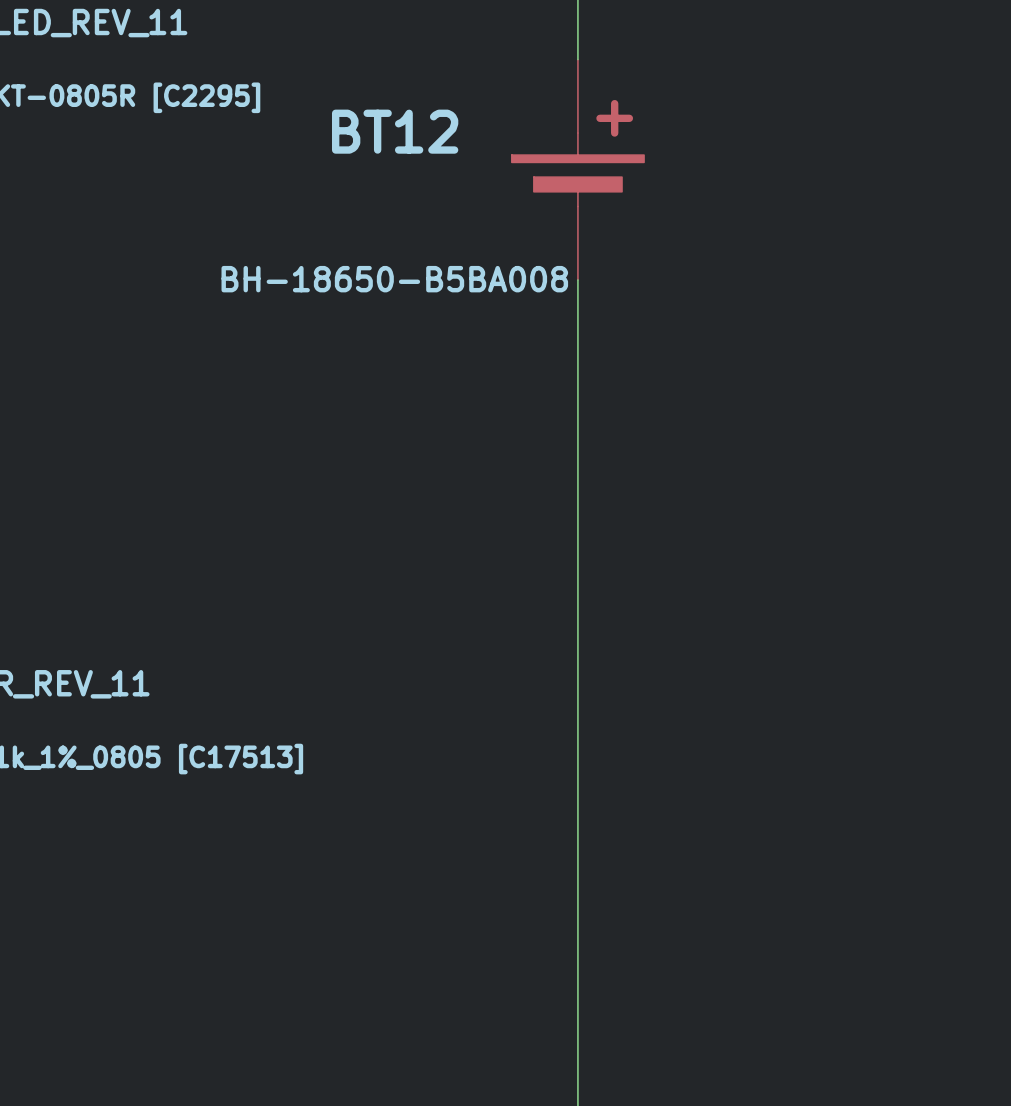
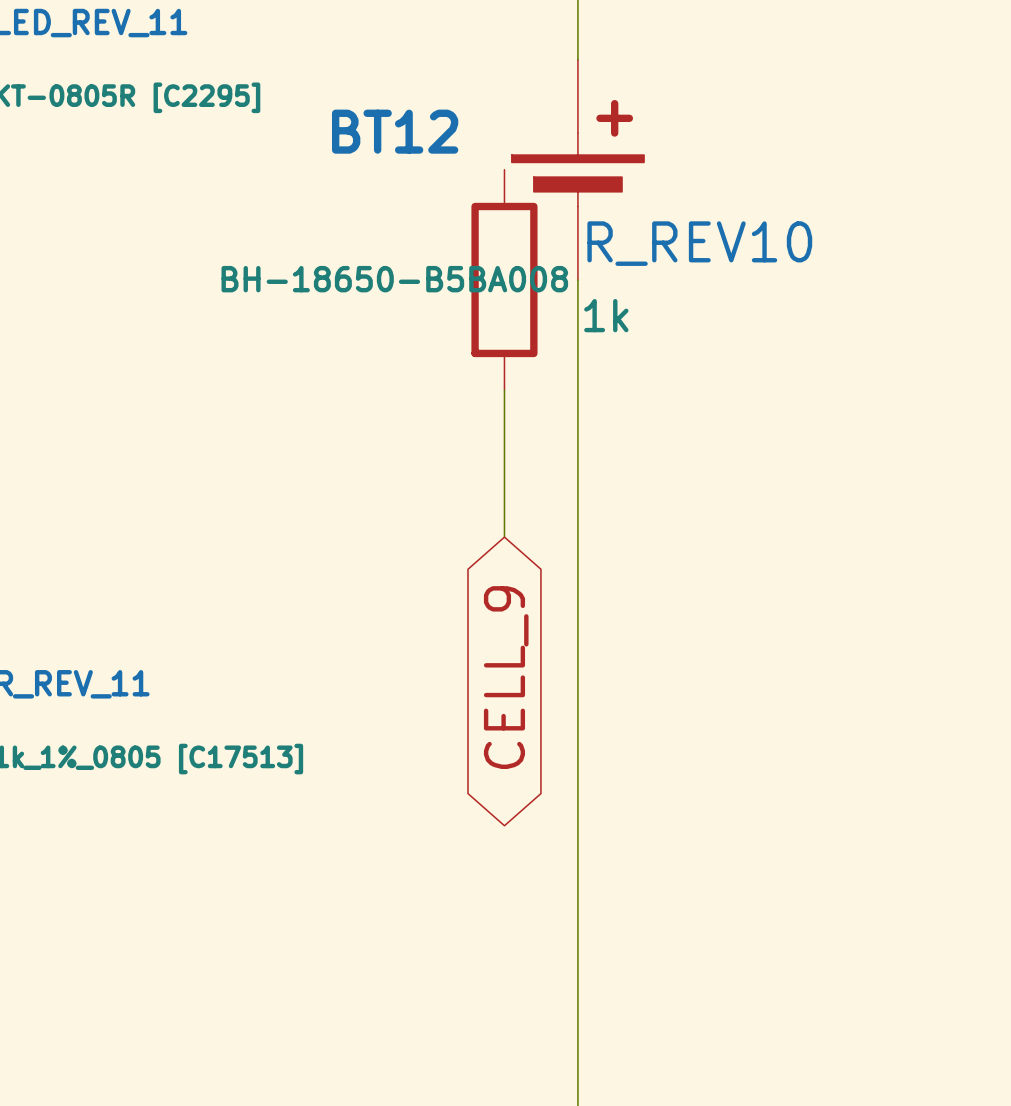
R_REV10: none -> 1k (504, 279)
wire: none -> (504, 390) (504, 537)
global label: none -> CELL_9 (506, 677)

